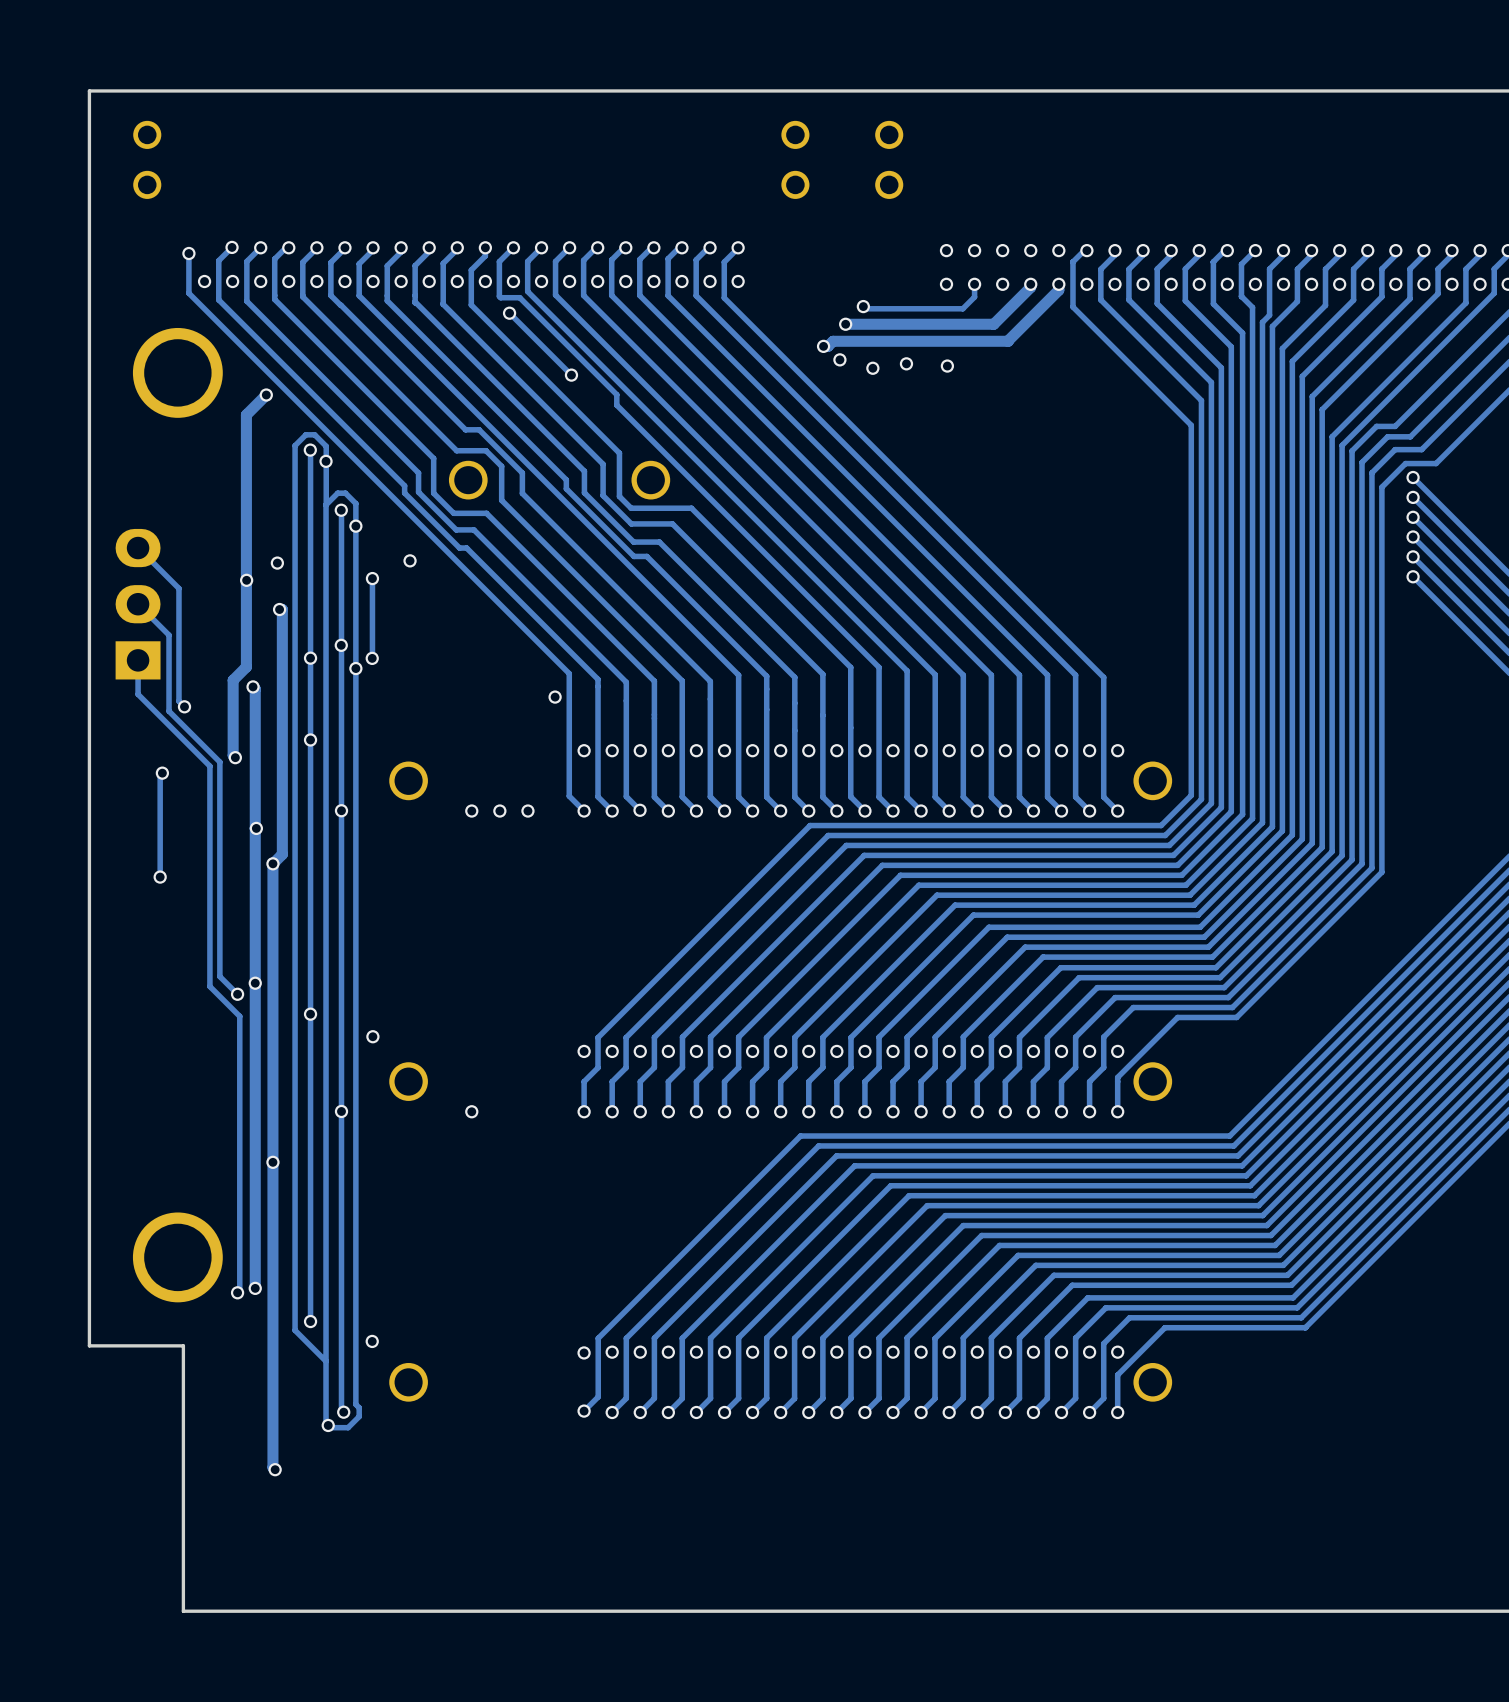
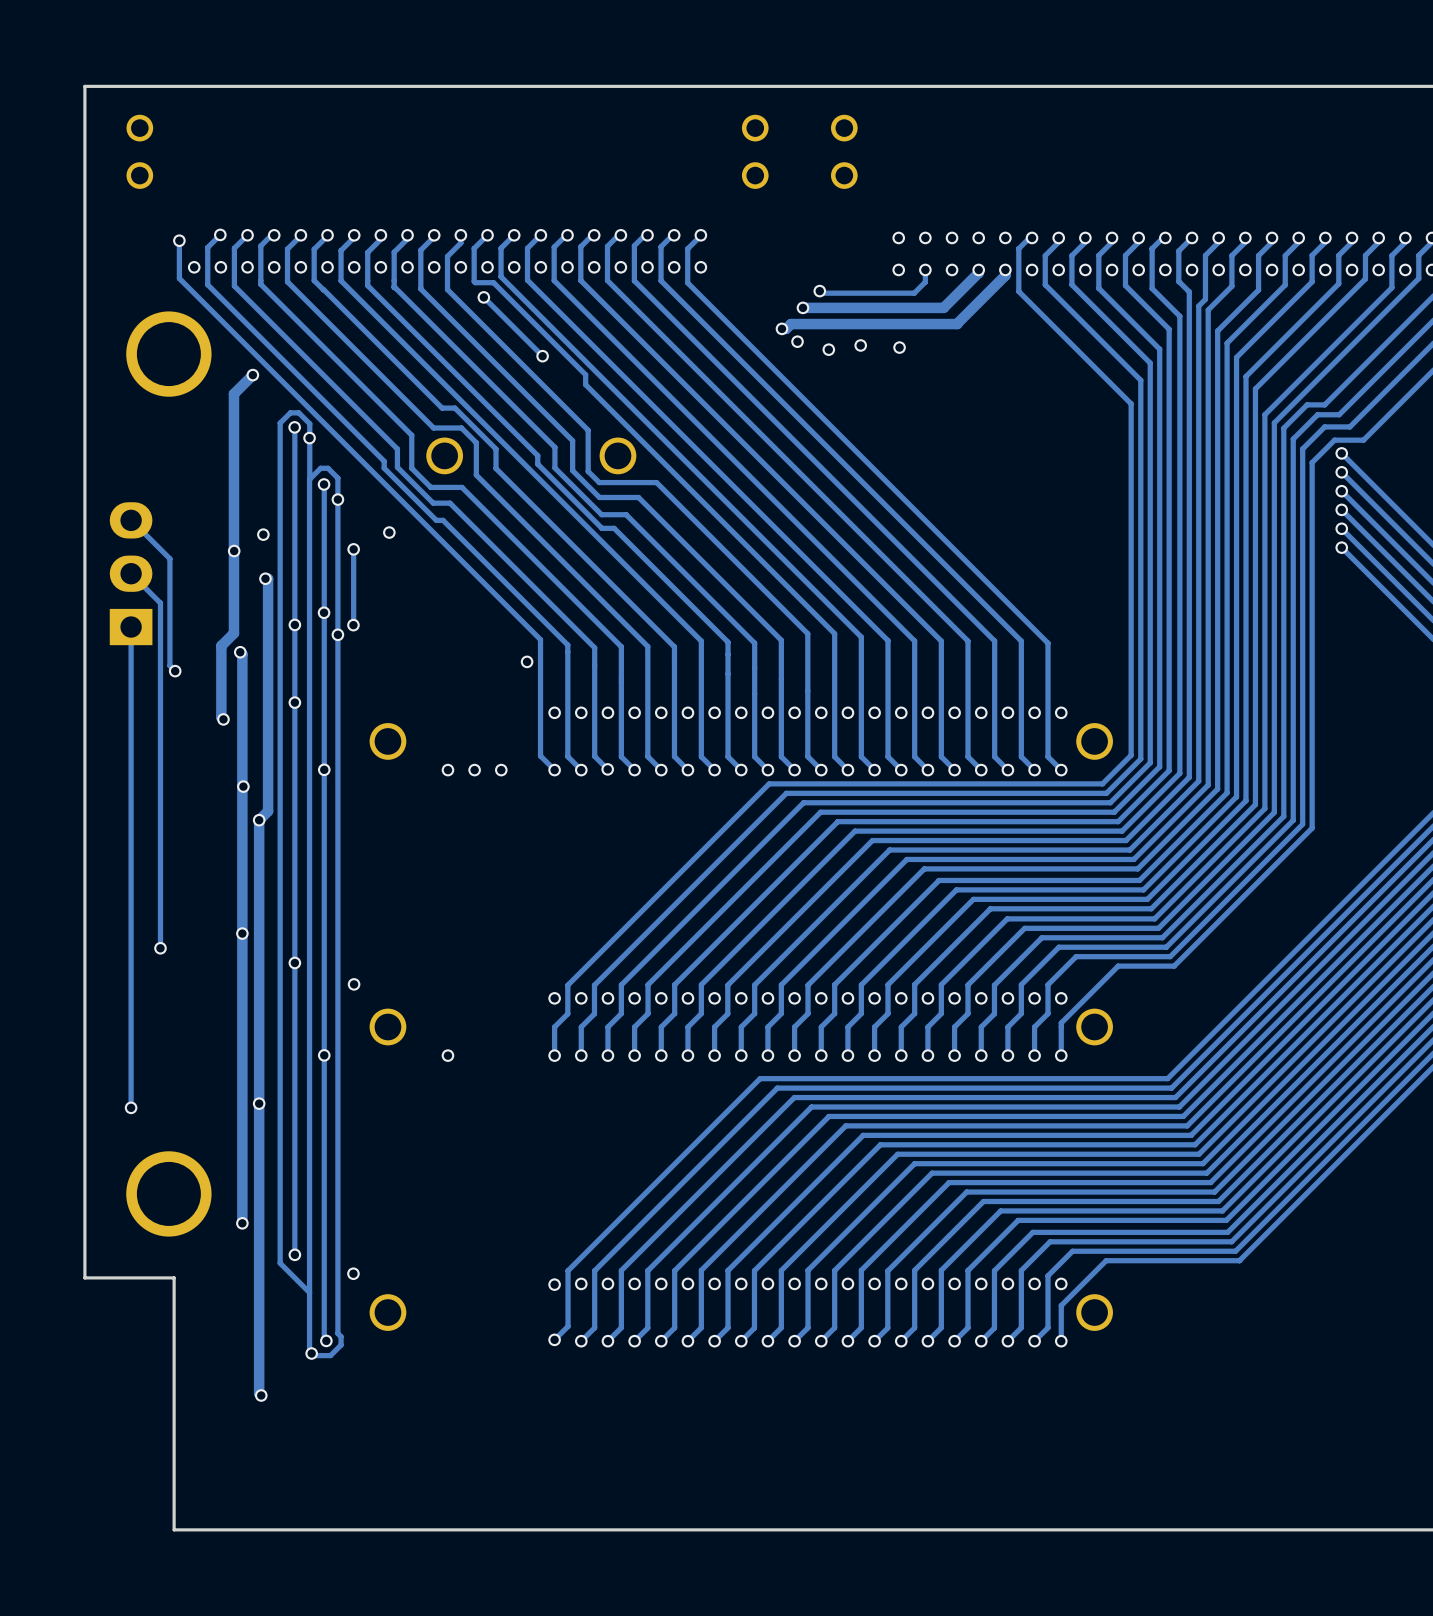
track: (138, 694) (209, 766) (209, 986) (239, 1016) (239, 1290) (237, 1292) -> (131, 659) (131, 1107)
track: (169, 711) (219, 762) (219, 976) (237, 994) -> (160, 675) (160, 948)
track: (162, 773) (160, 775) (160, 877) -> none
via: (162, 773) -> none
via: (160, 877) -> none
via: (237, 994) -> none
via: none -> (160, 948)
via: none -> (131, 1107)
via: (237, 1292) -> none

